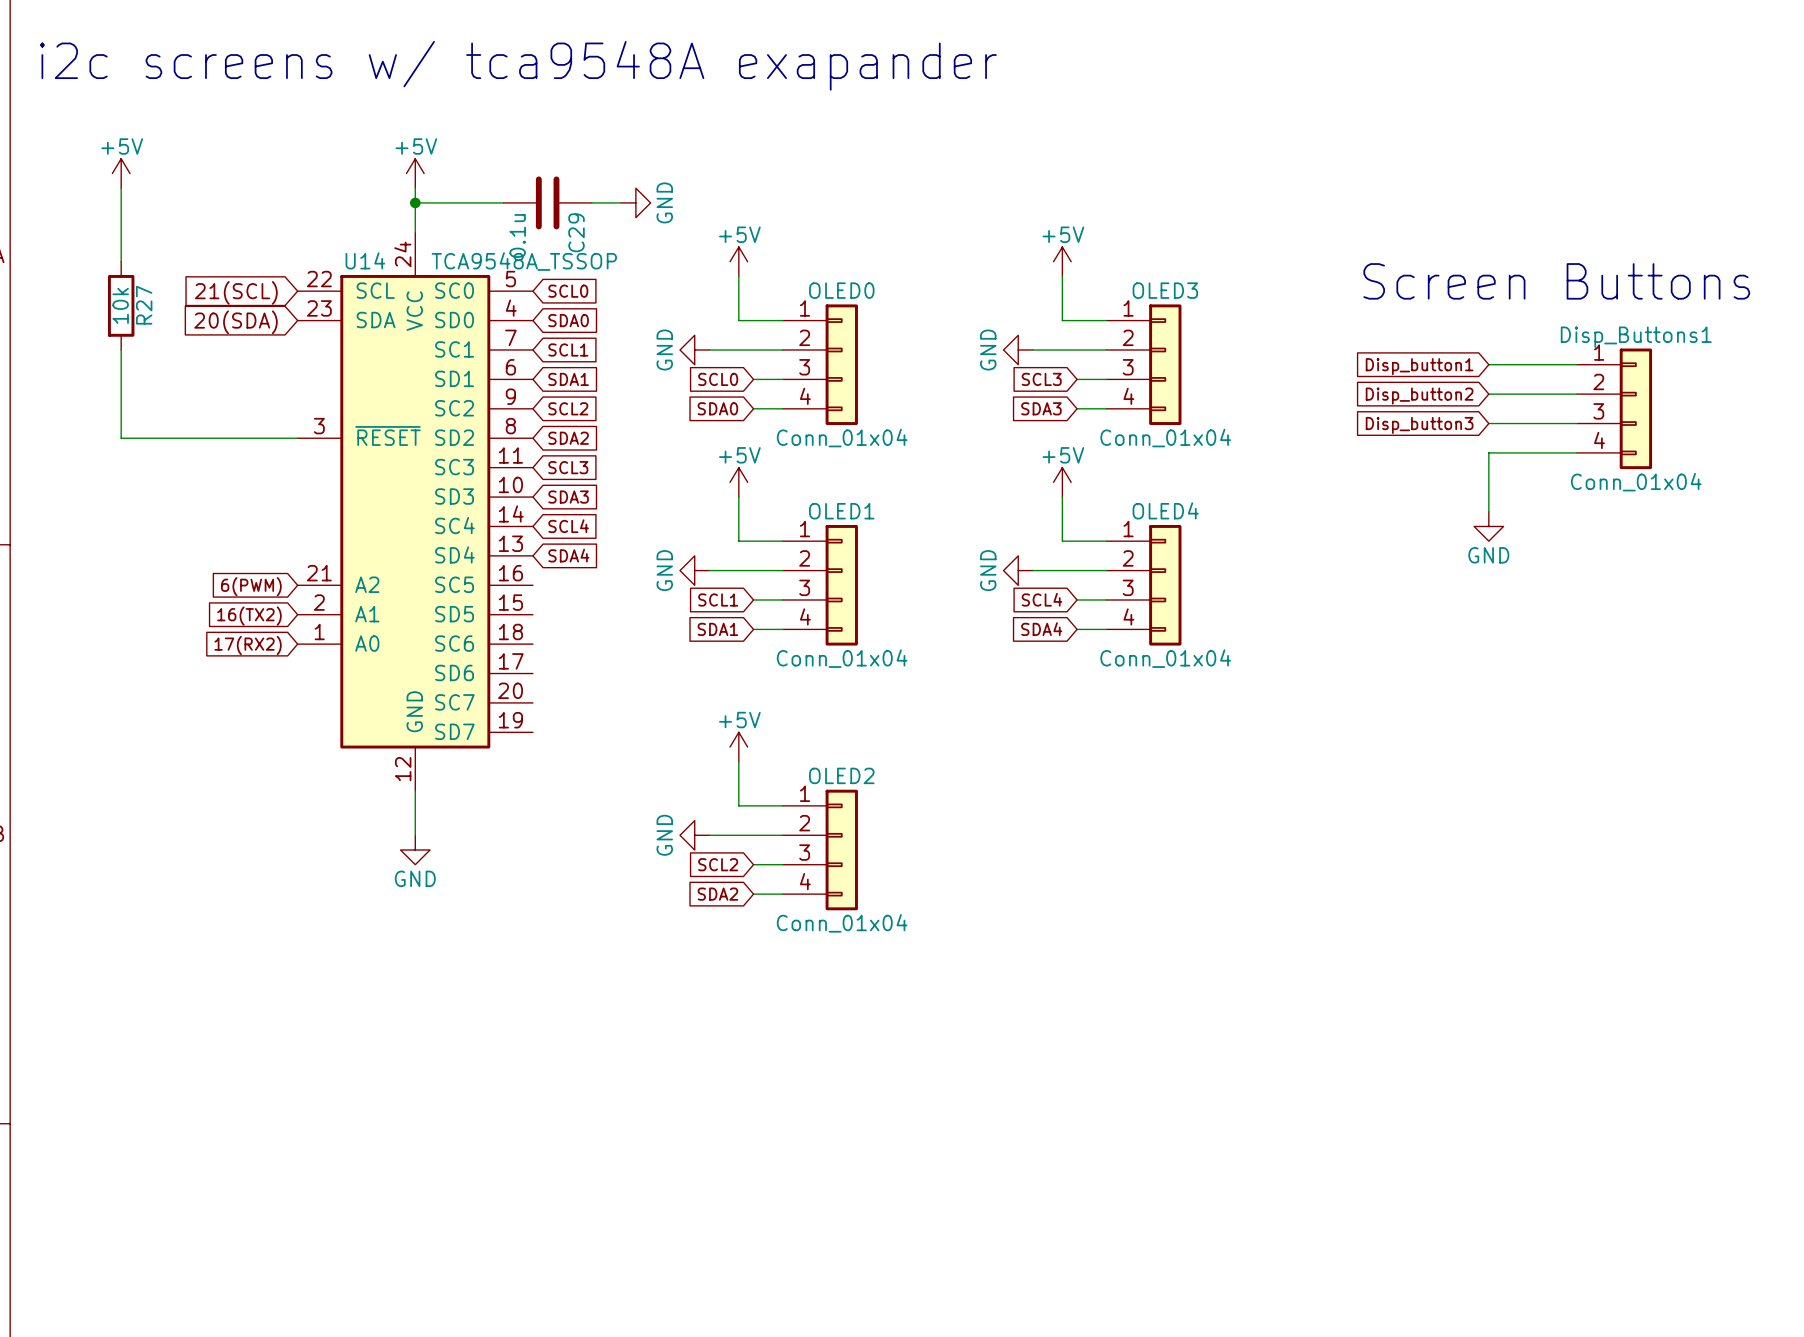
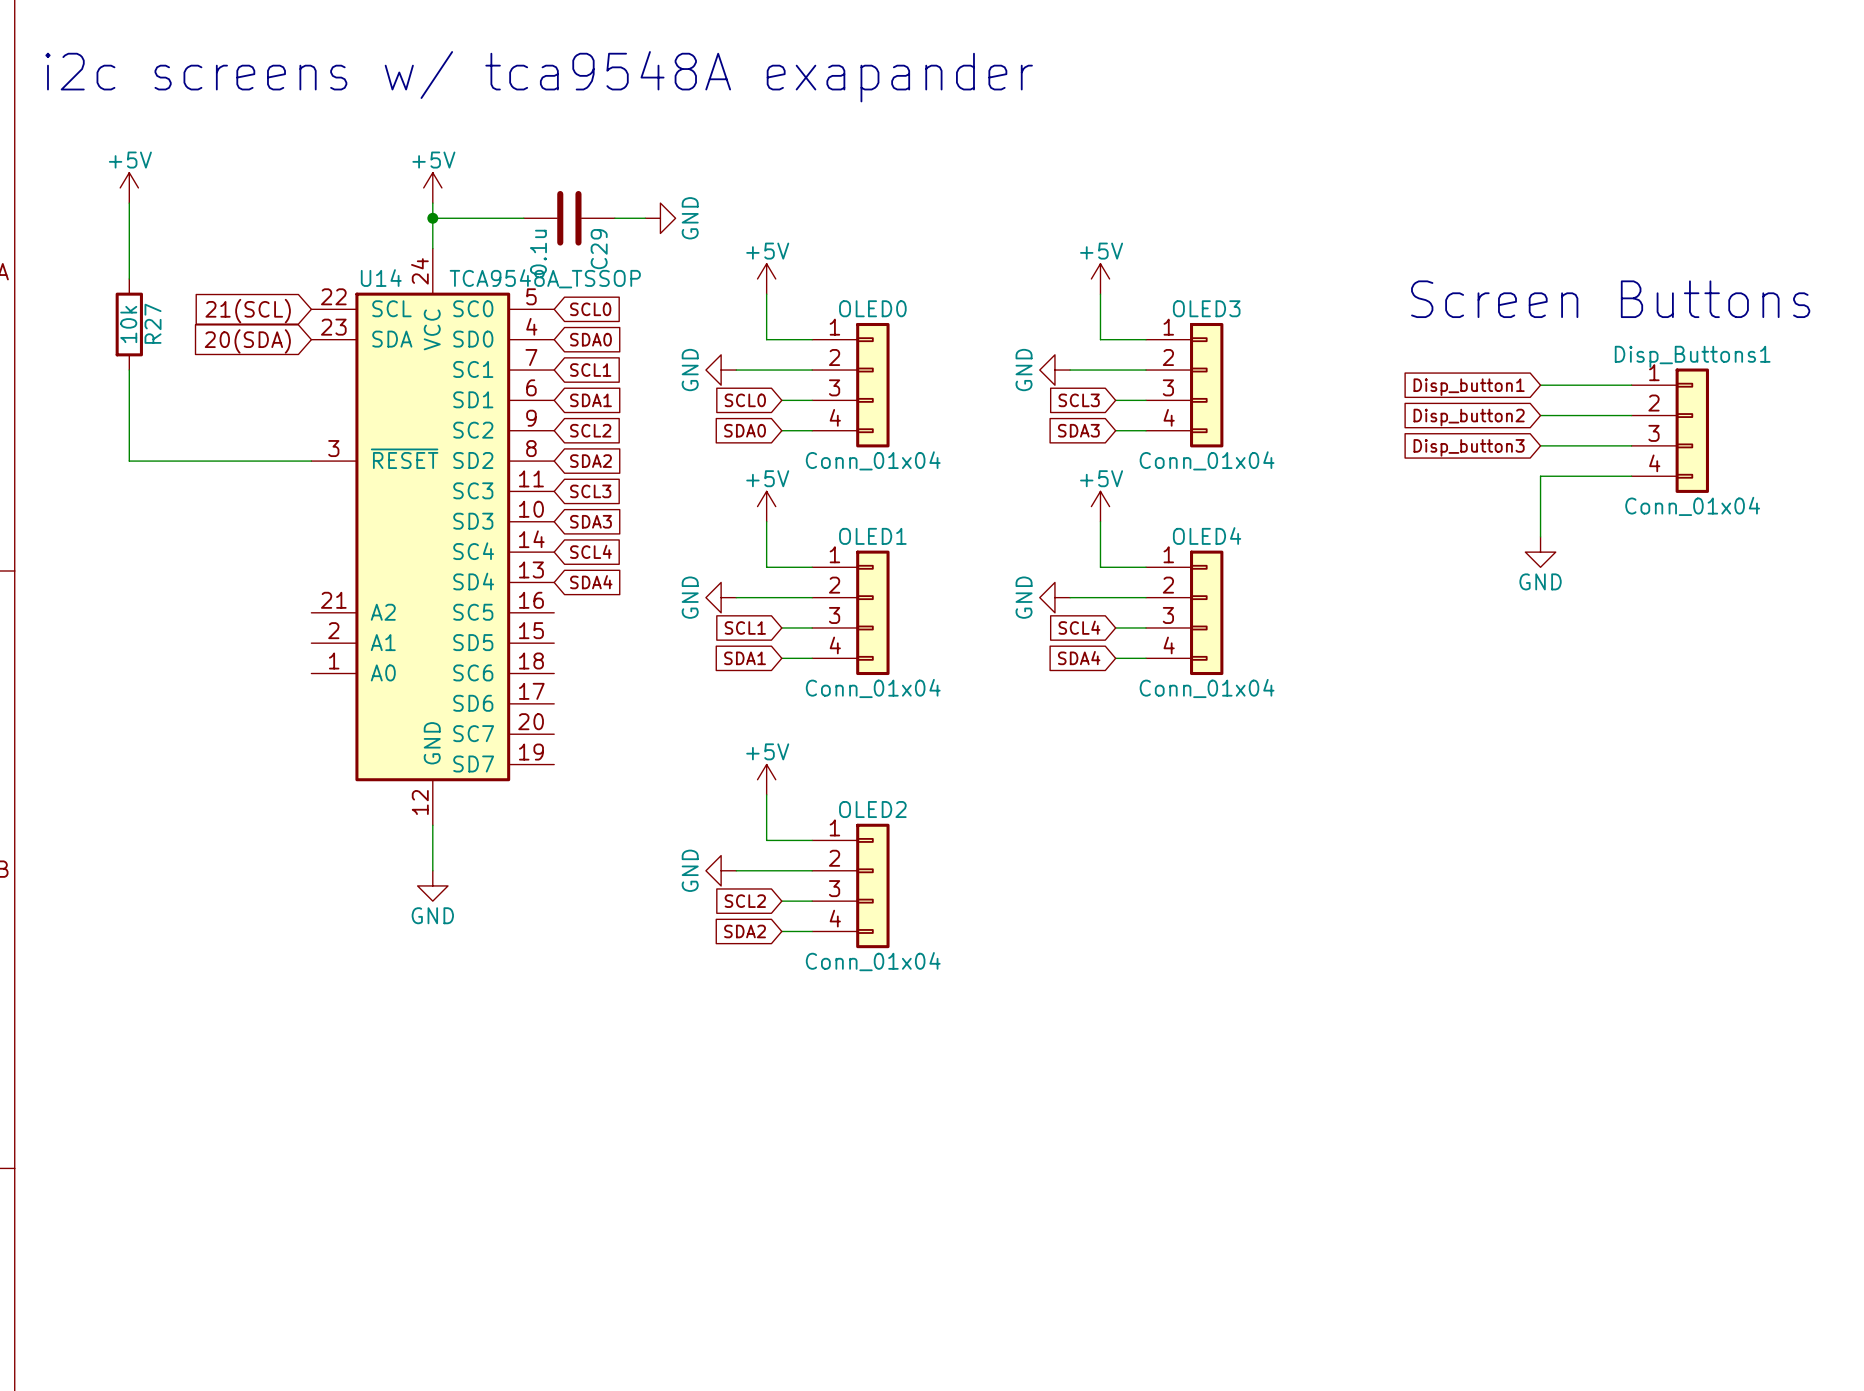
global label: 6(PWM) (251, 586) -> none
global label: 16(TX2) (249, 616) -> none
global label: 17(RX2) (248, 645) -> none

